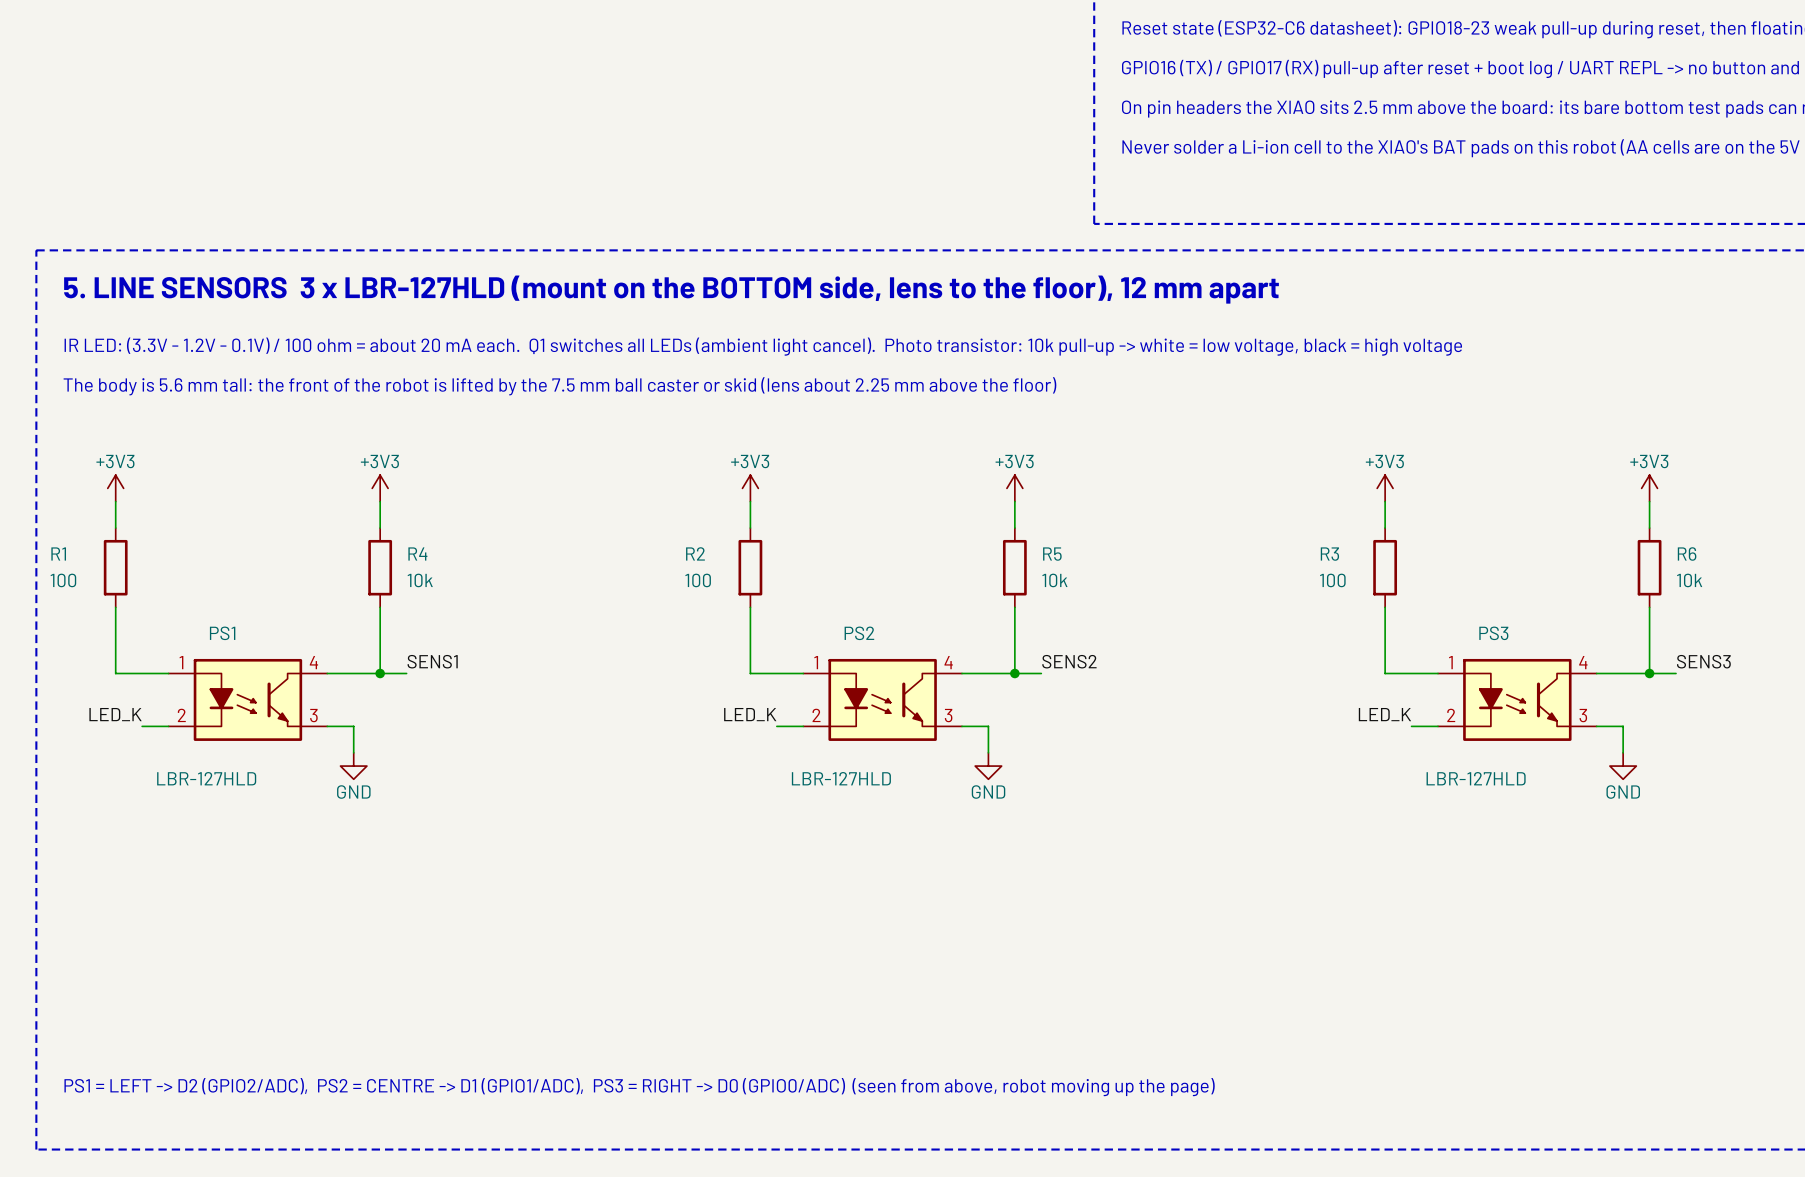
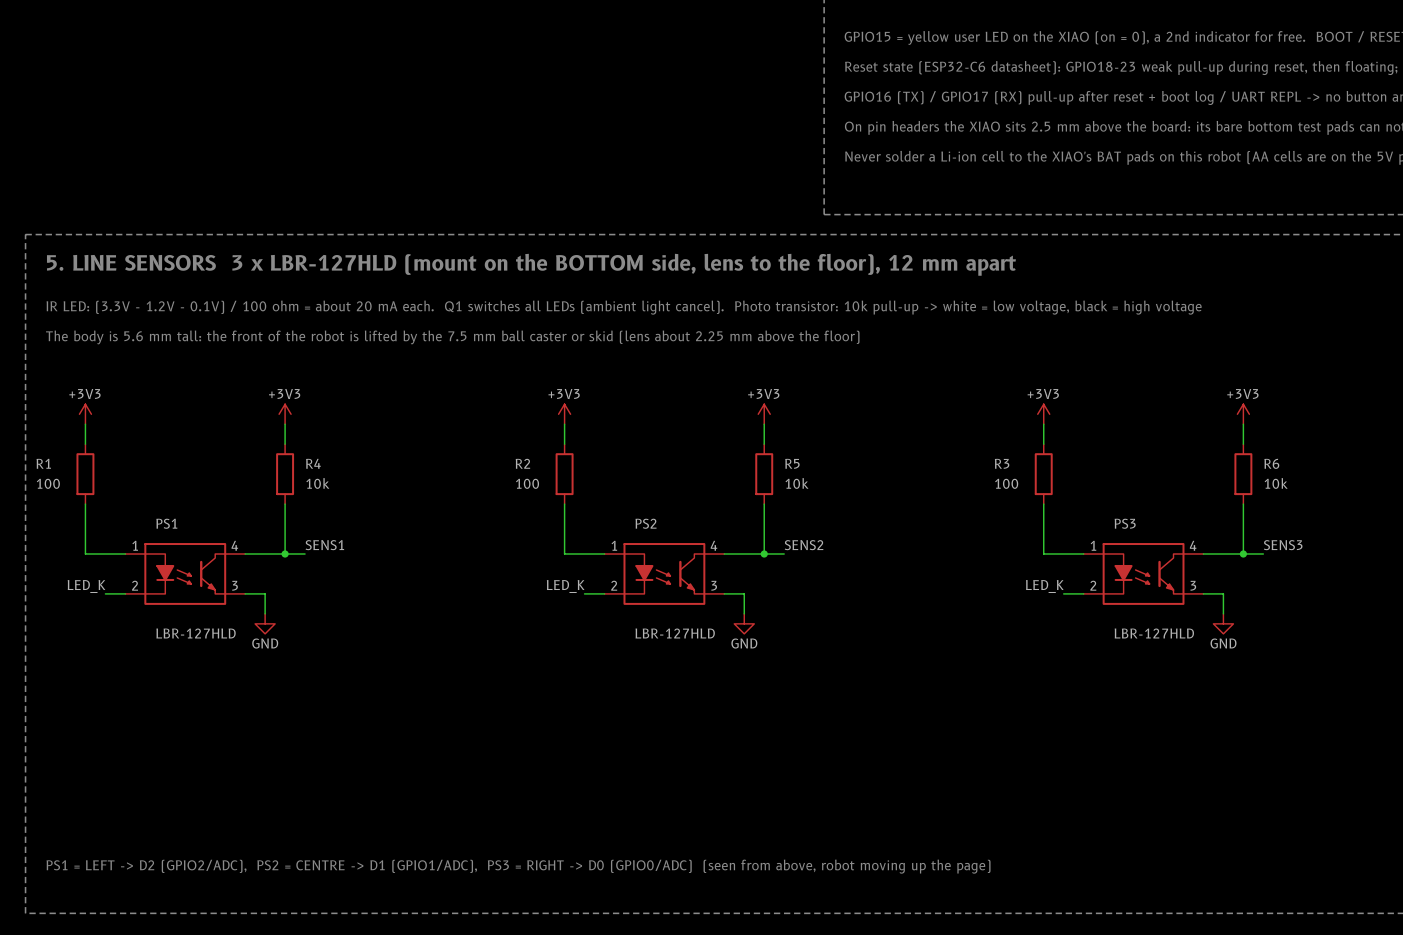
PS1 value position: LBR-127HLD (206, 778) -> LBR-127HLD (196, 633)
PS2 value position: LBR-127HLD (841, 778) -> LBR-127HLD (675, 633)
PS3 value position: LBR-127HLD (1476, 778) -> LBR-127HLD (1154, 633)

